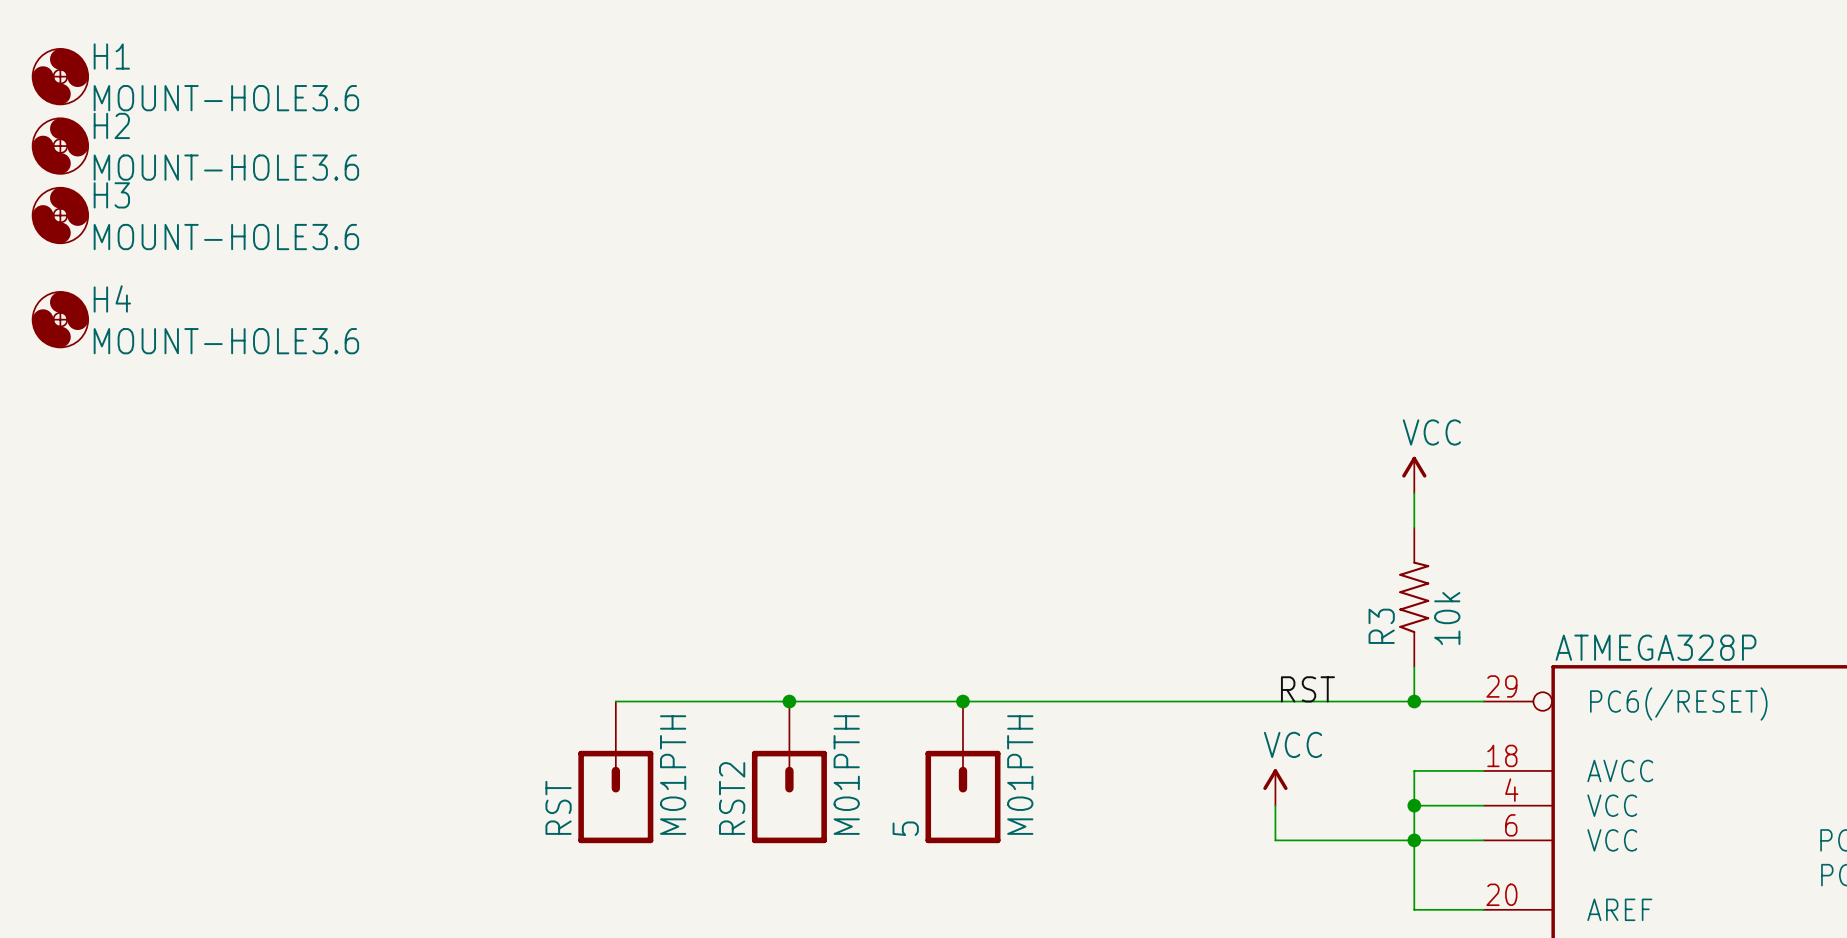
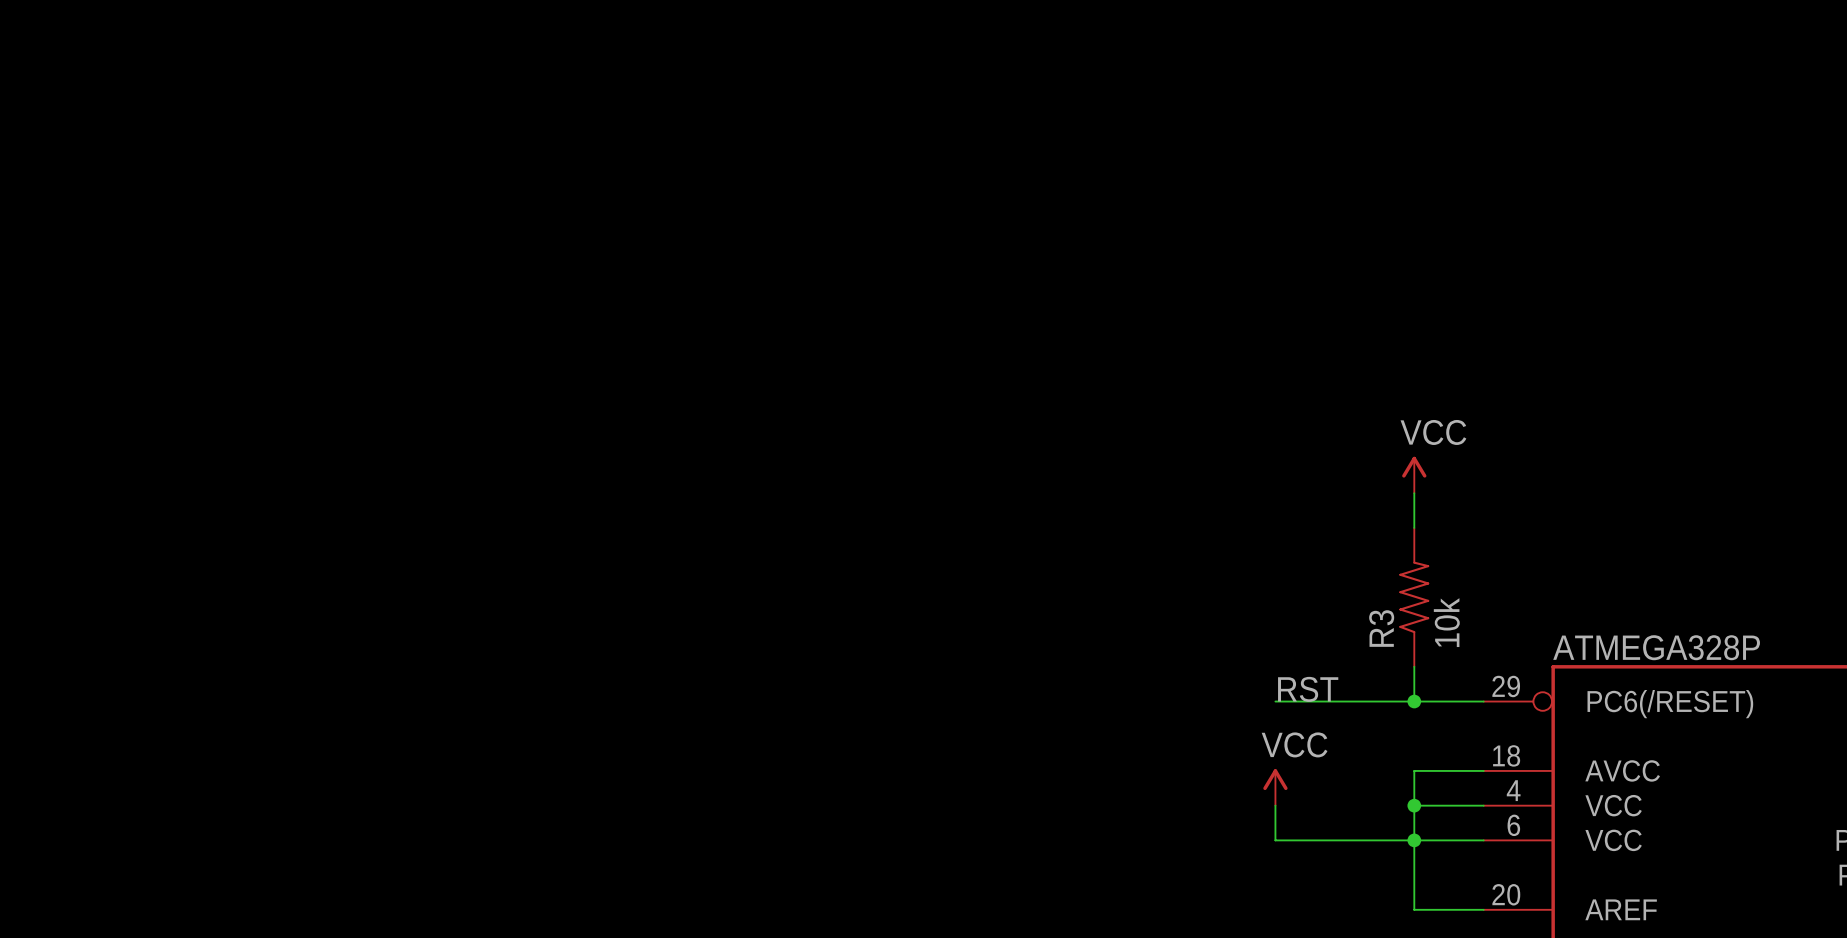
H1: MOUNT-HOLE3.6 (60, 76) -> none
H2: MOUNT-HOLE3.6 (60, 146) -> none
H3: MOUNT-HOLE3.6 (60, 215) -> none
H4: MOUNT-HOLE3.6 (60, 319) -> none
wire: (615, 701) (1275, 701) -> none
junction: (789, 701) -> none
junction: (962, 701) -> none
RST: M01PTH (615, 772) -> none
RST2: M01PTH (789, 772) -> none
5: M01PTH (962, 772) -> none

